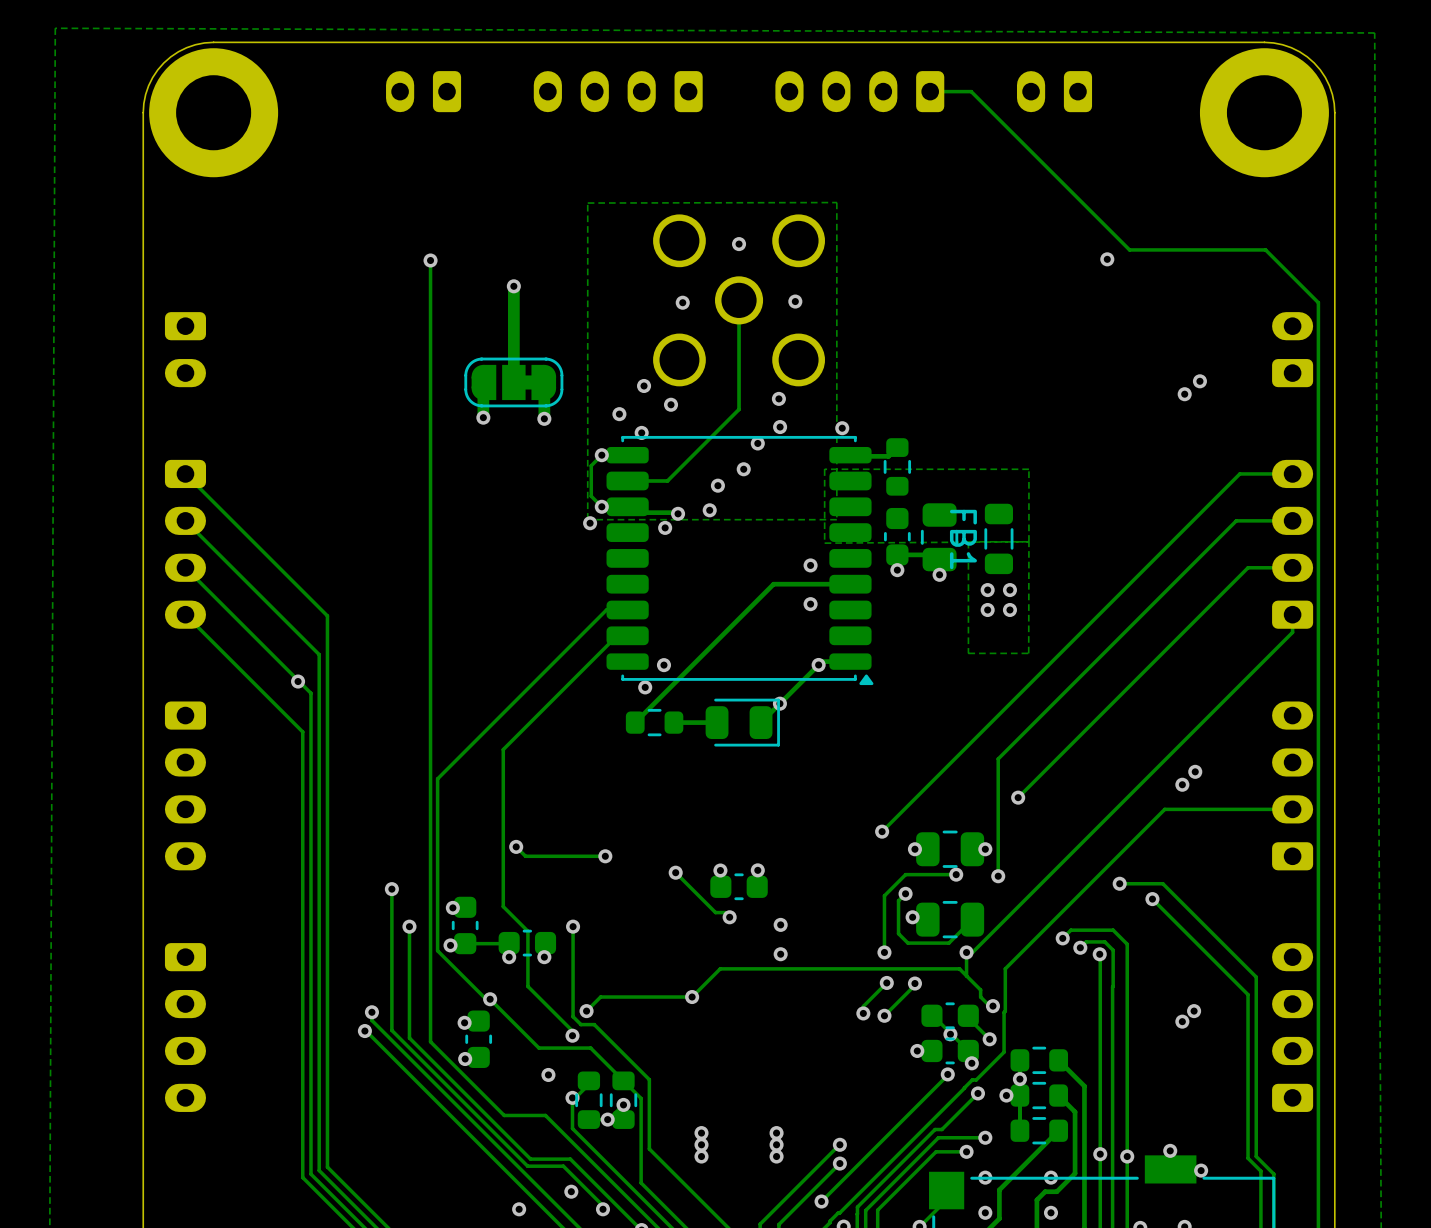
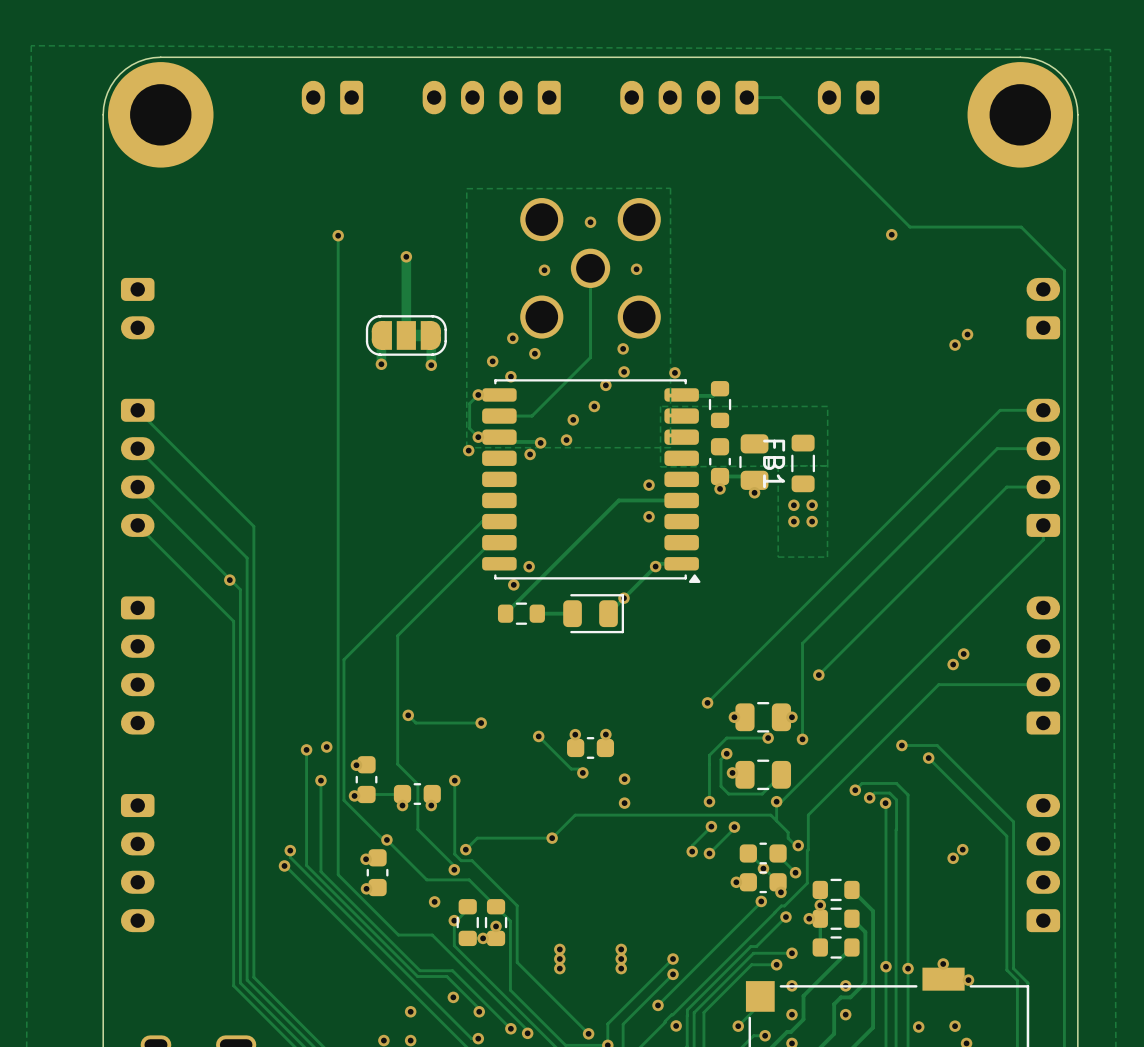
via: none -> (326, 747)

